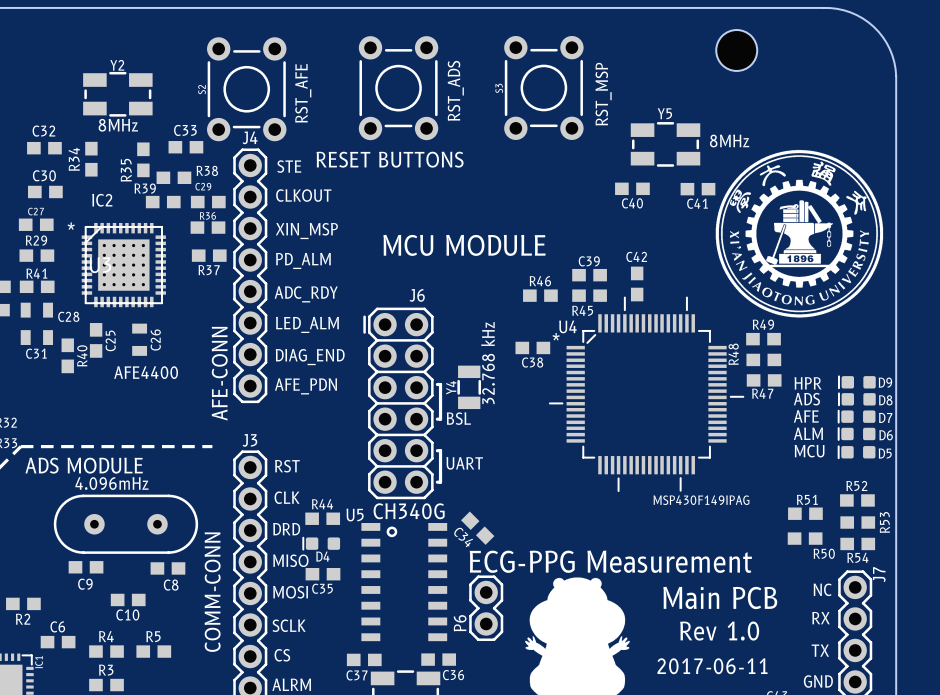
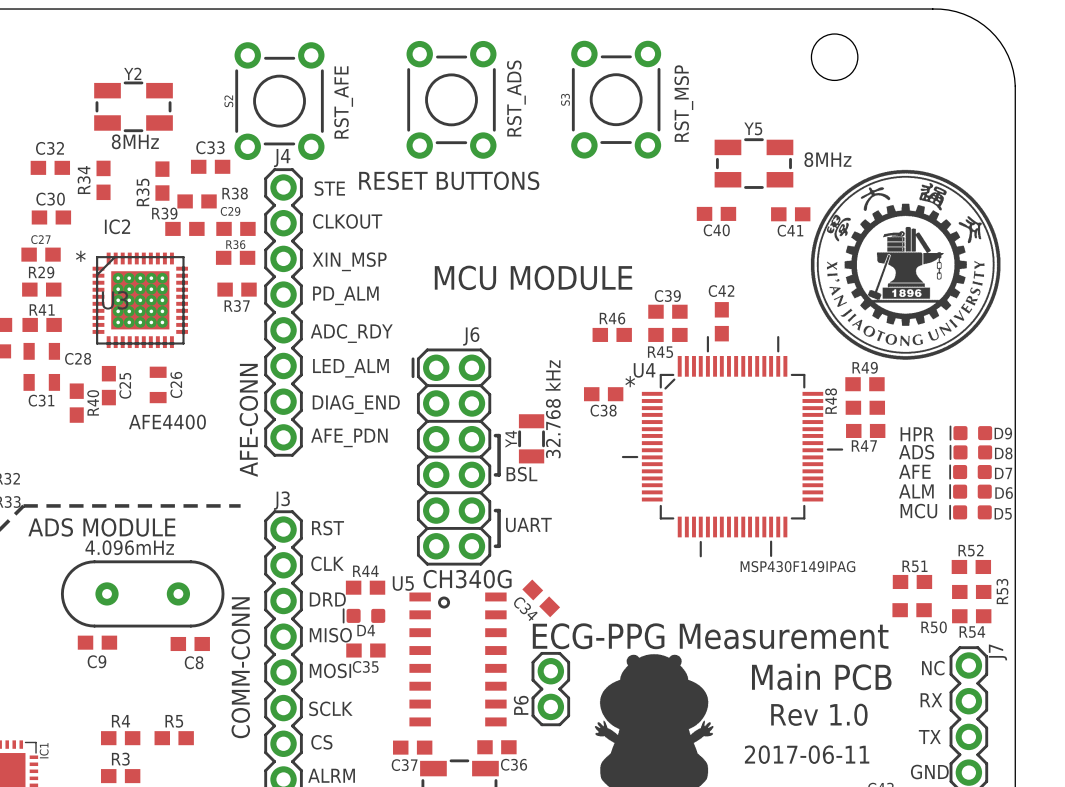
C10: (128, 599) -> none
R2: (23, 603) -> none
C6: (58, 642) -> none

